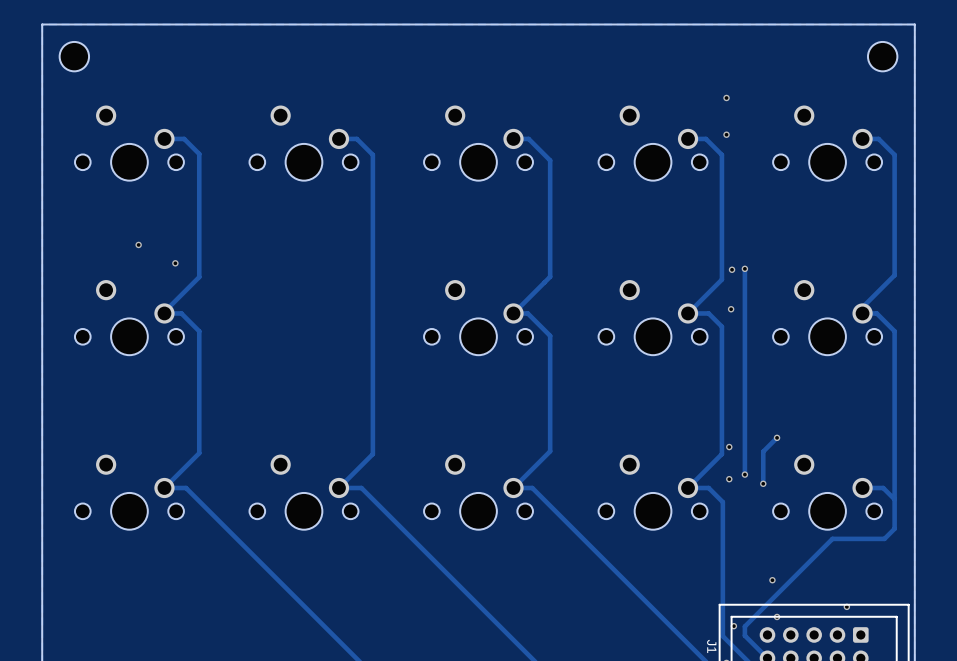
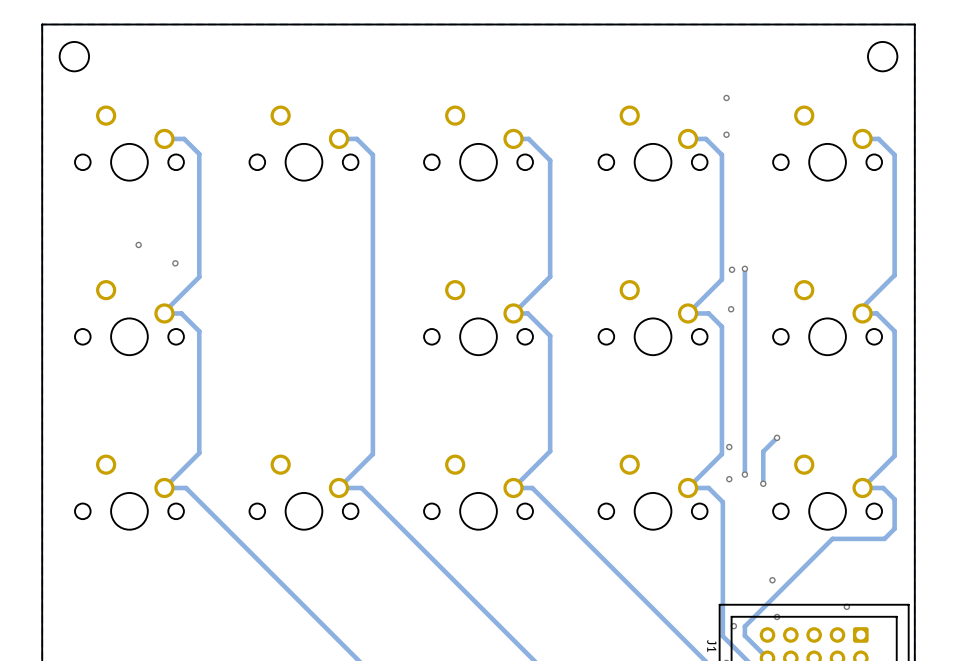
track: (894, 455) (894, 499) -> (894, 455) (862, 488)

